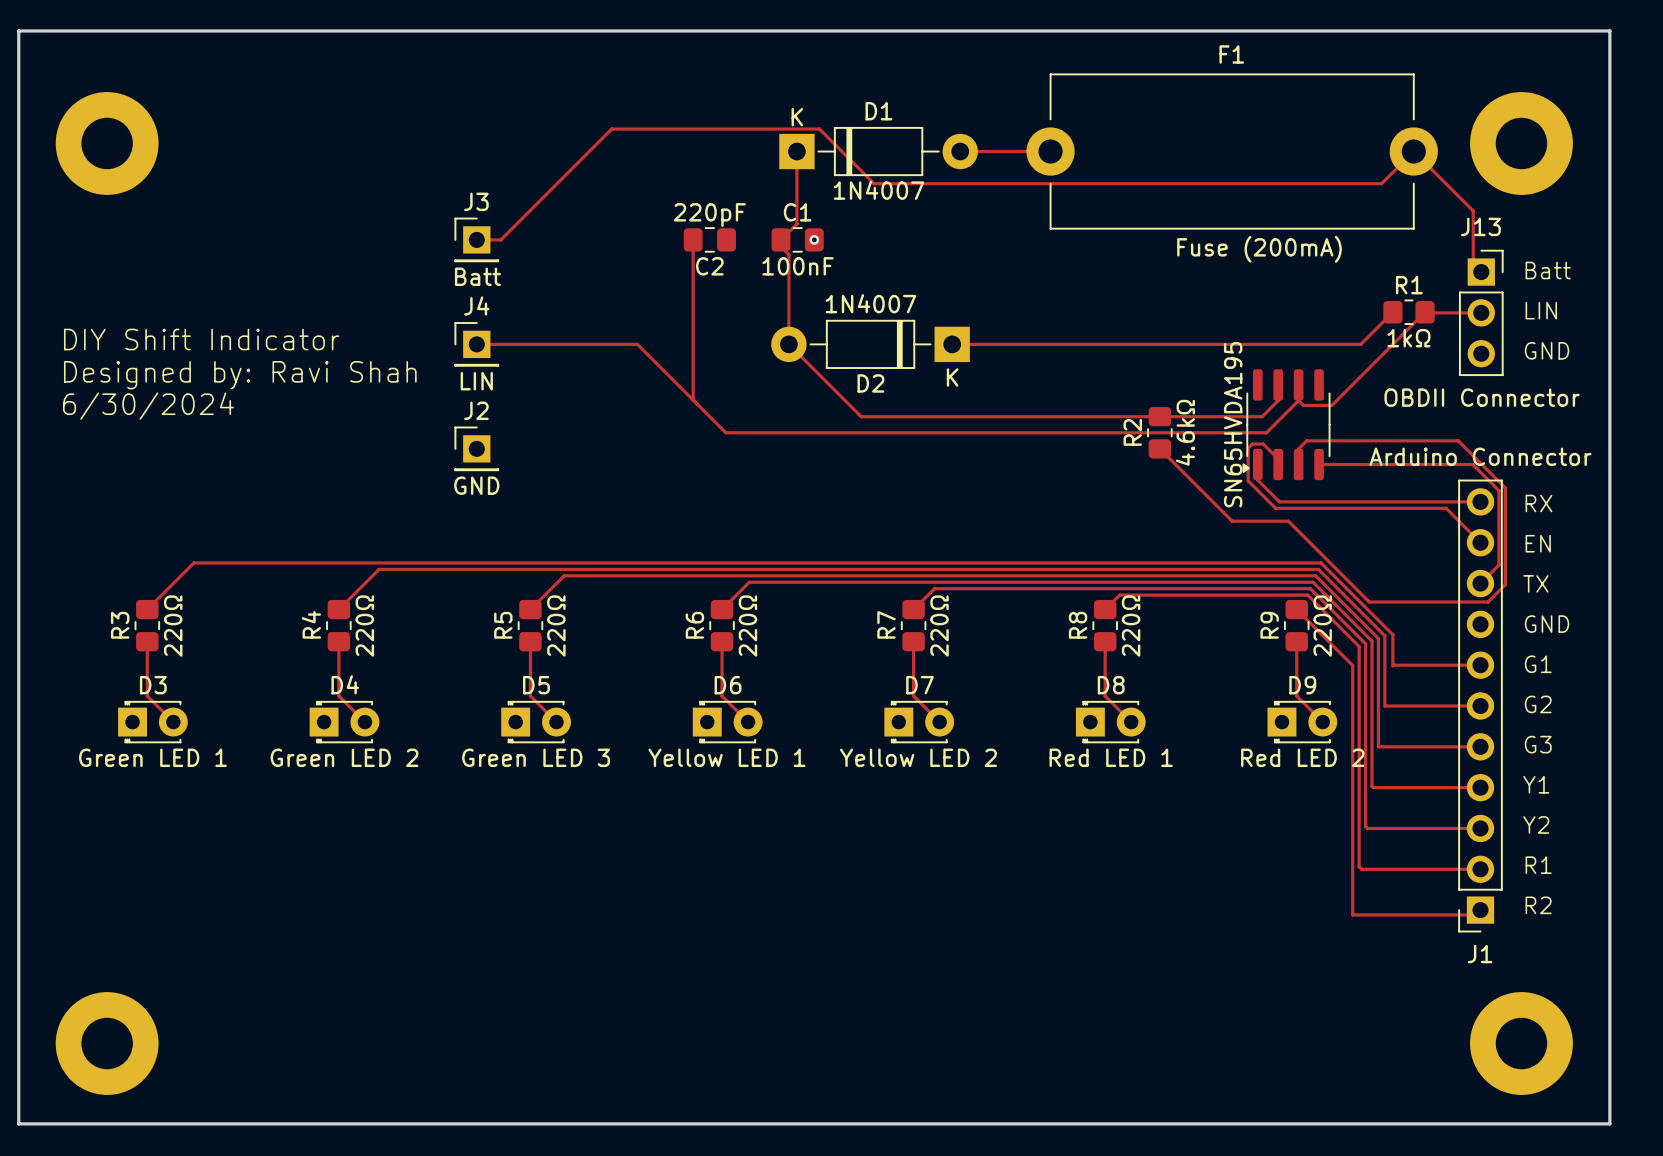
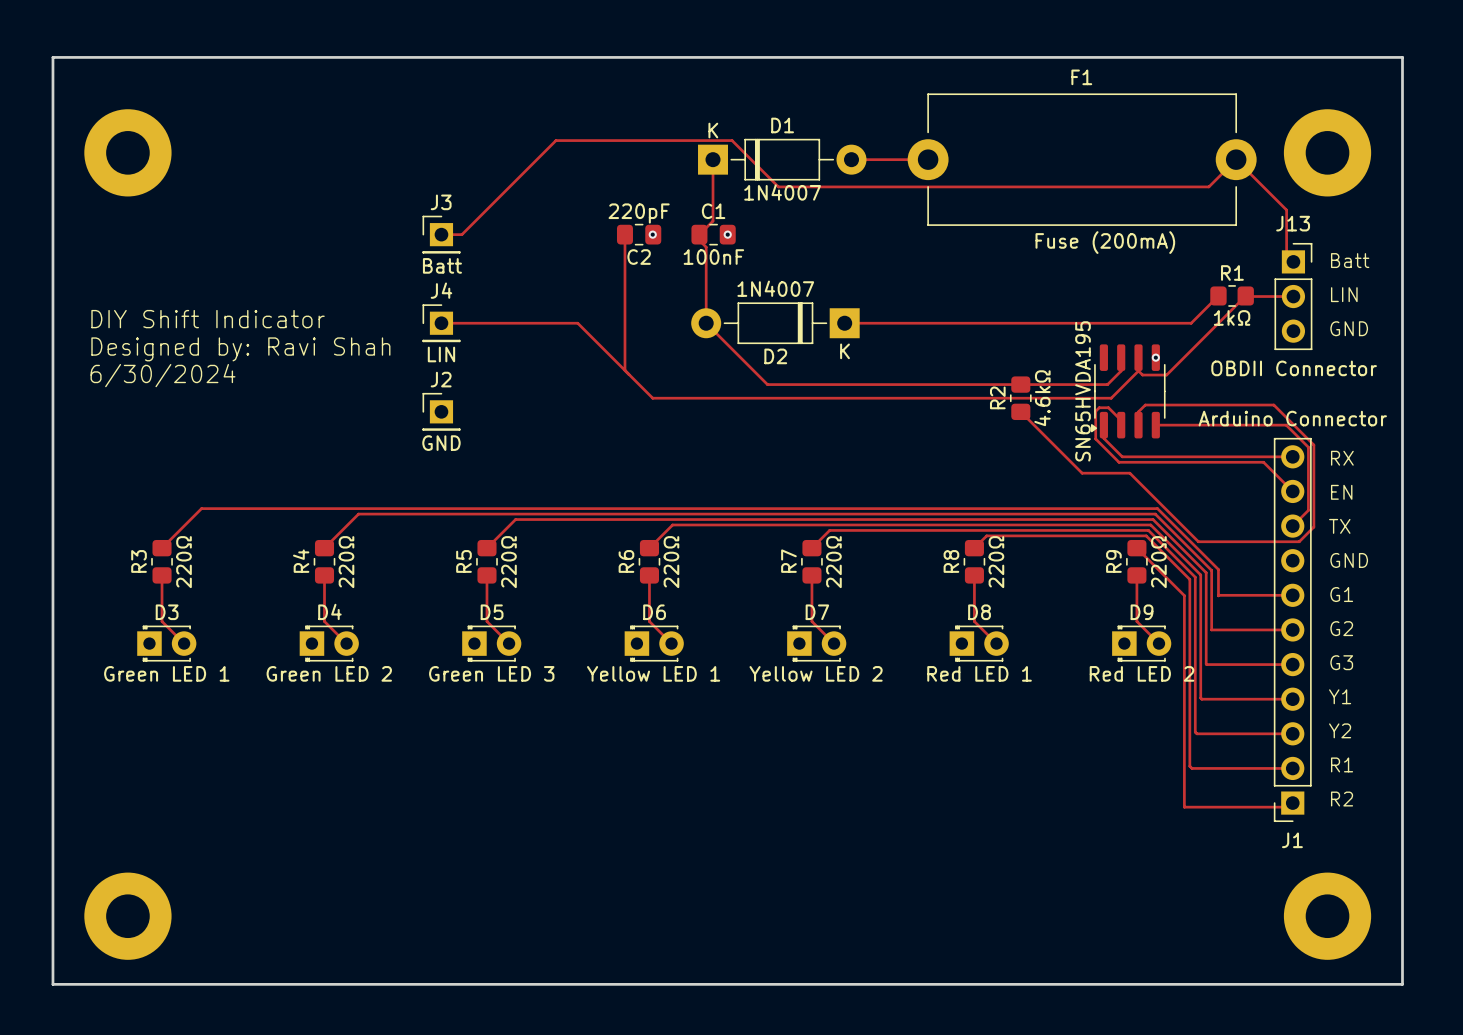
via: none -> (652, 234)
via: none -> (1155, 357)

